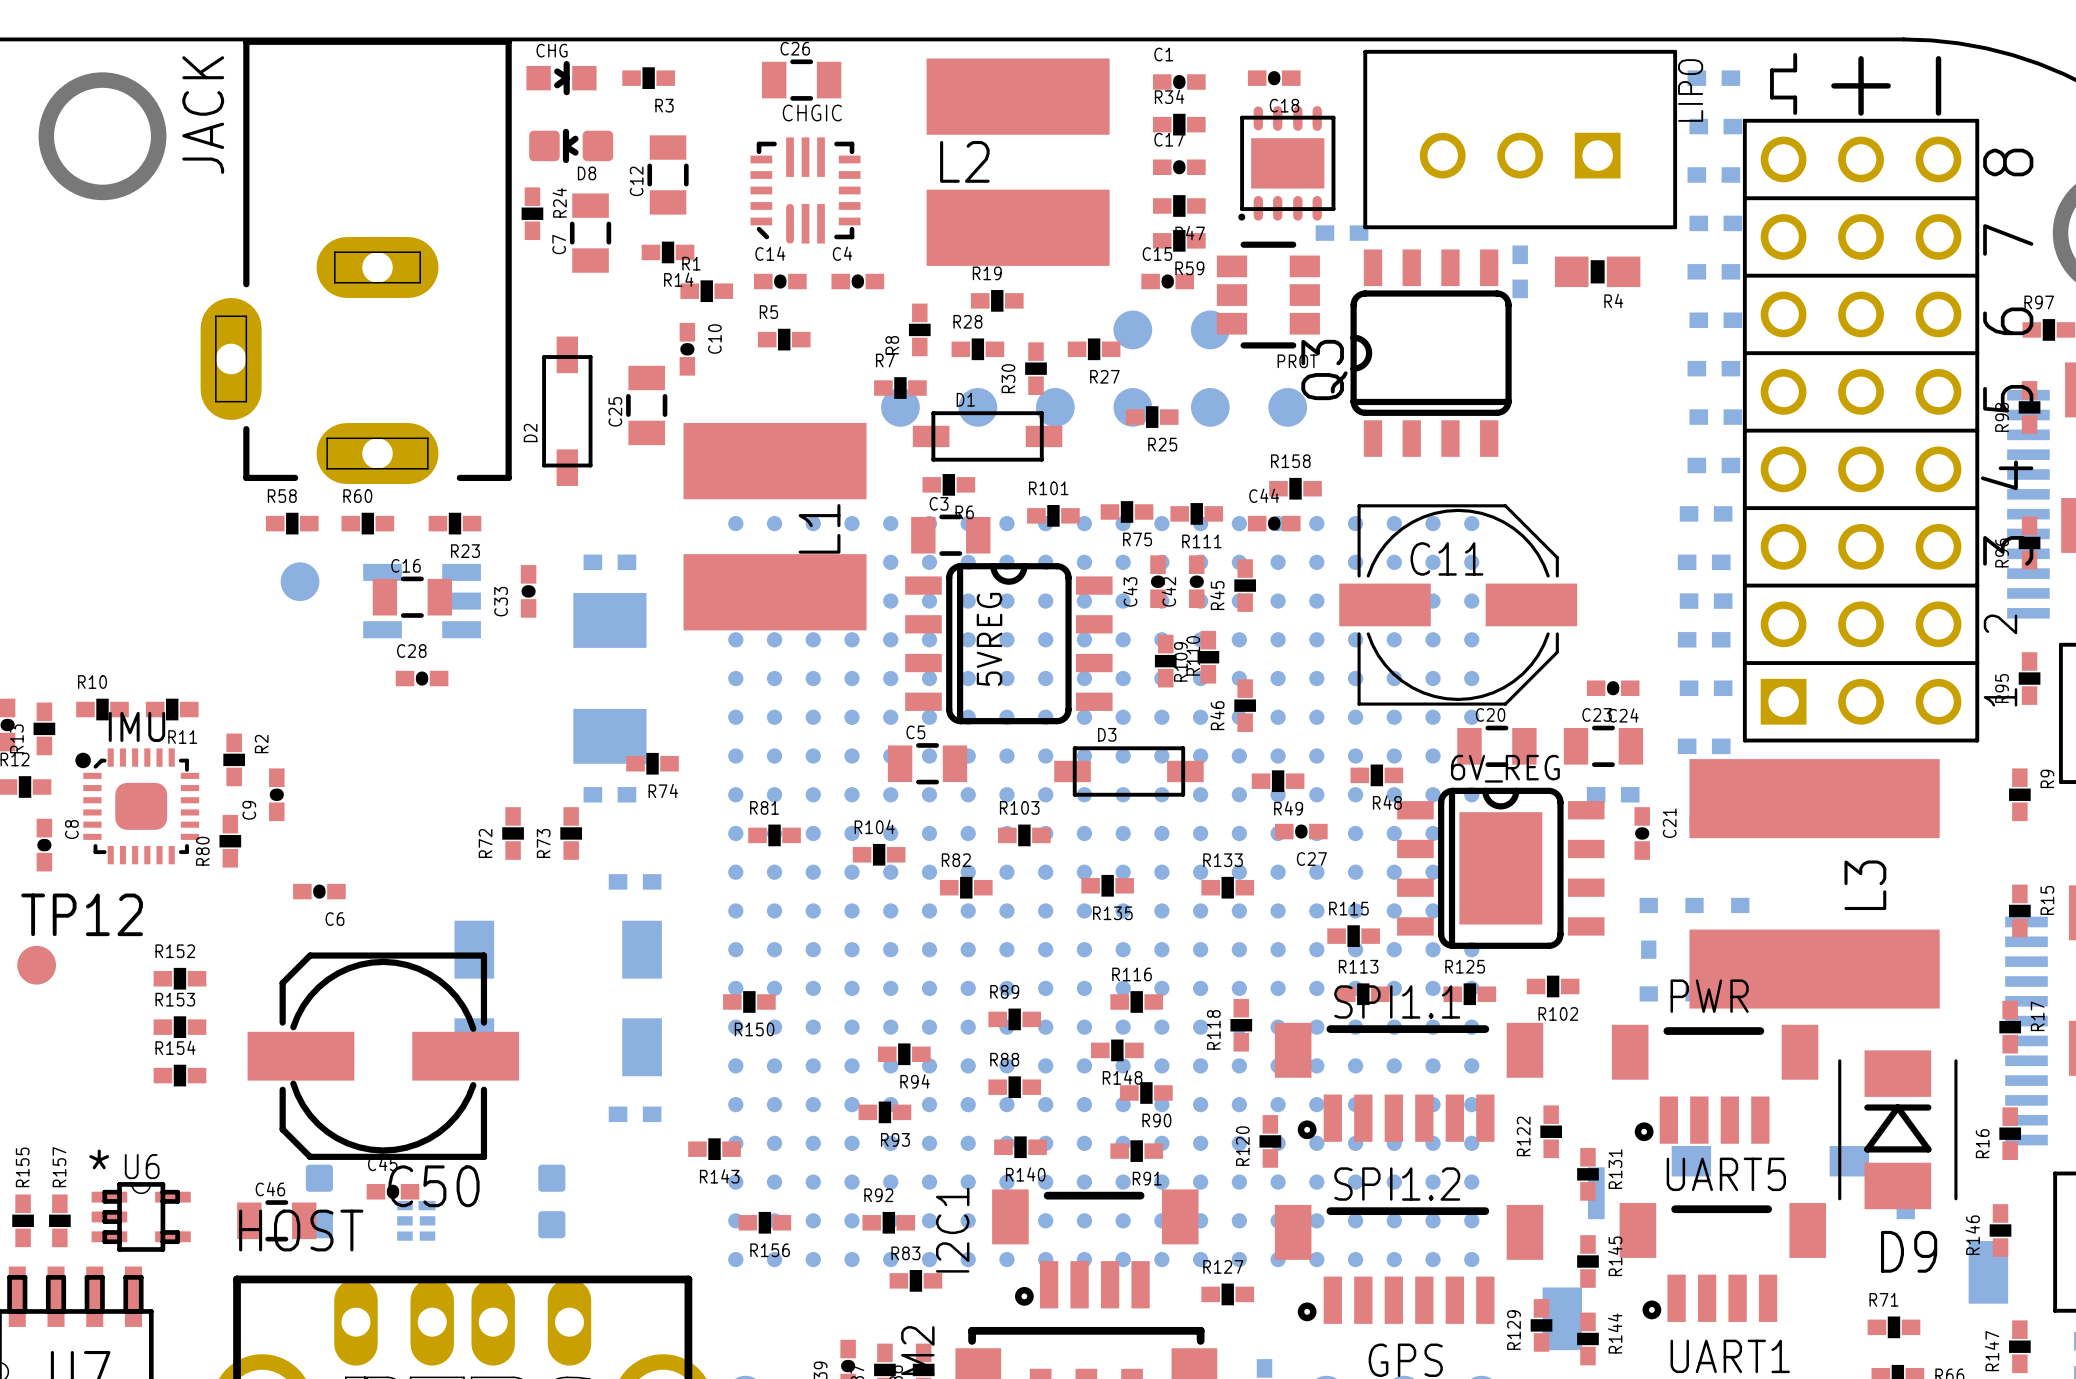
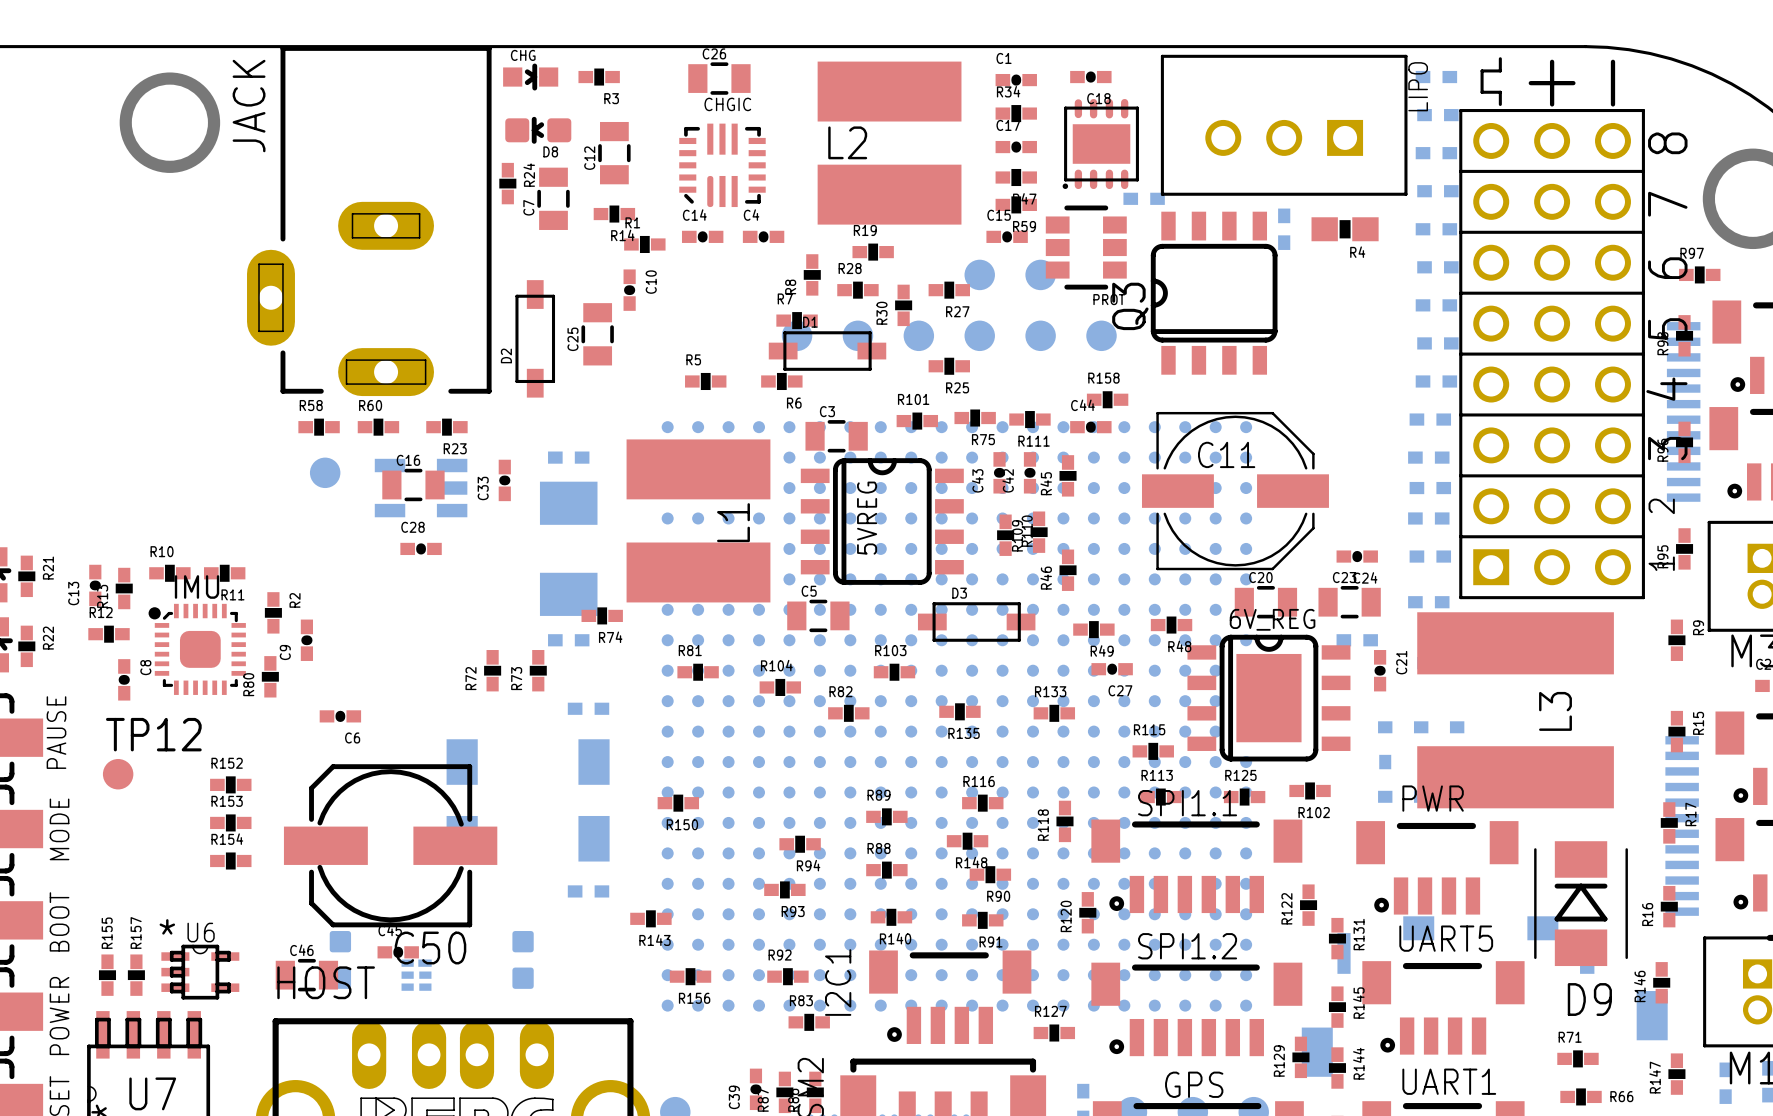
R5 position: (784, 339) -> (705, 381)
R25 position: (1152, 417) -> (949, 366)
D1 position: (987, 436) -> (827, 351)
R6 position: (948, 484) -> (781, 381)
L1 position: (775, 526) -> (698, 520)

